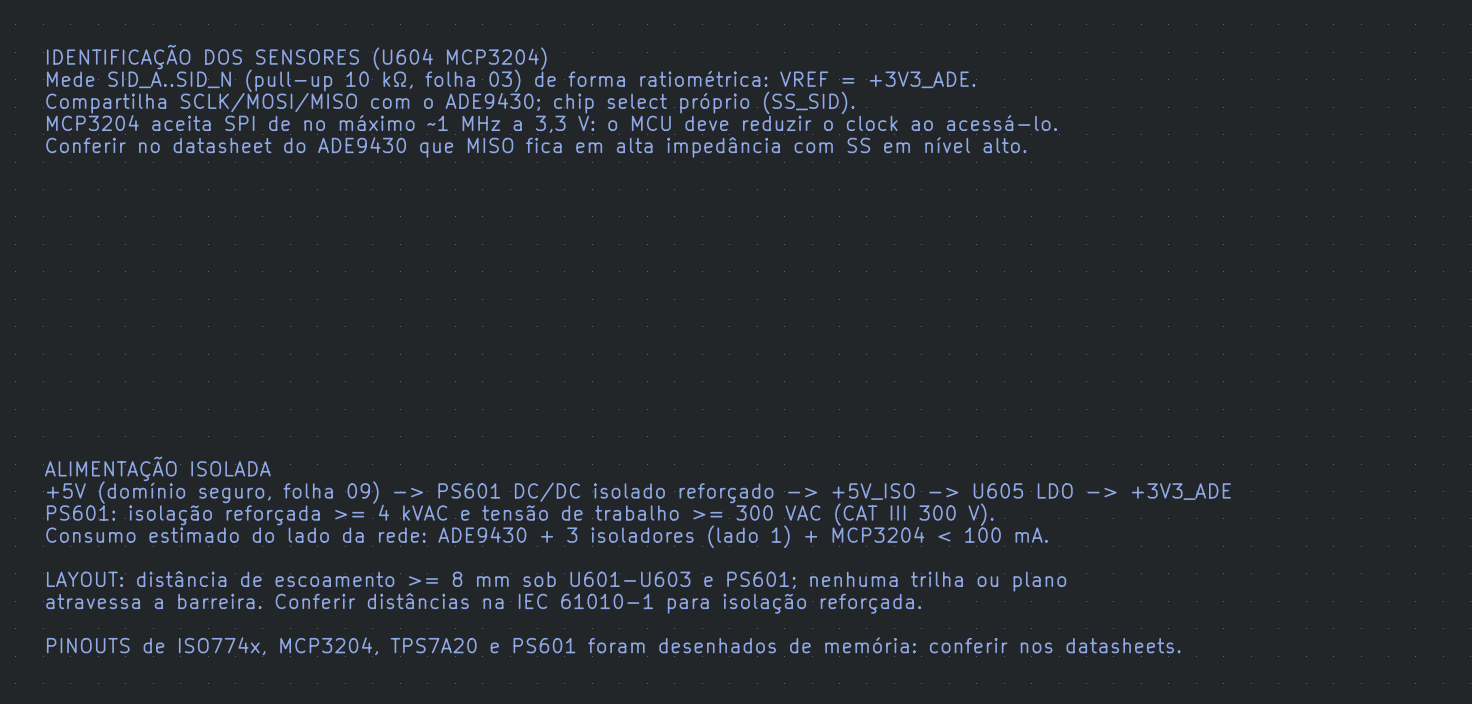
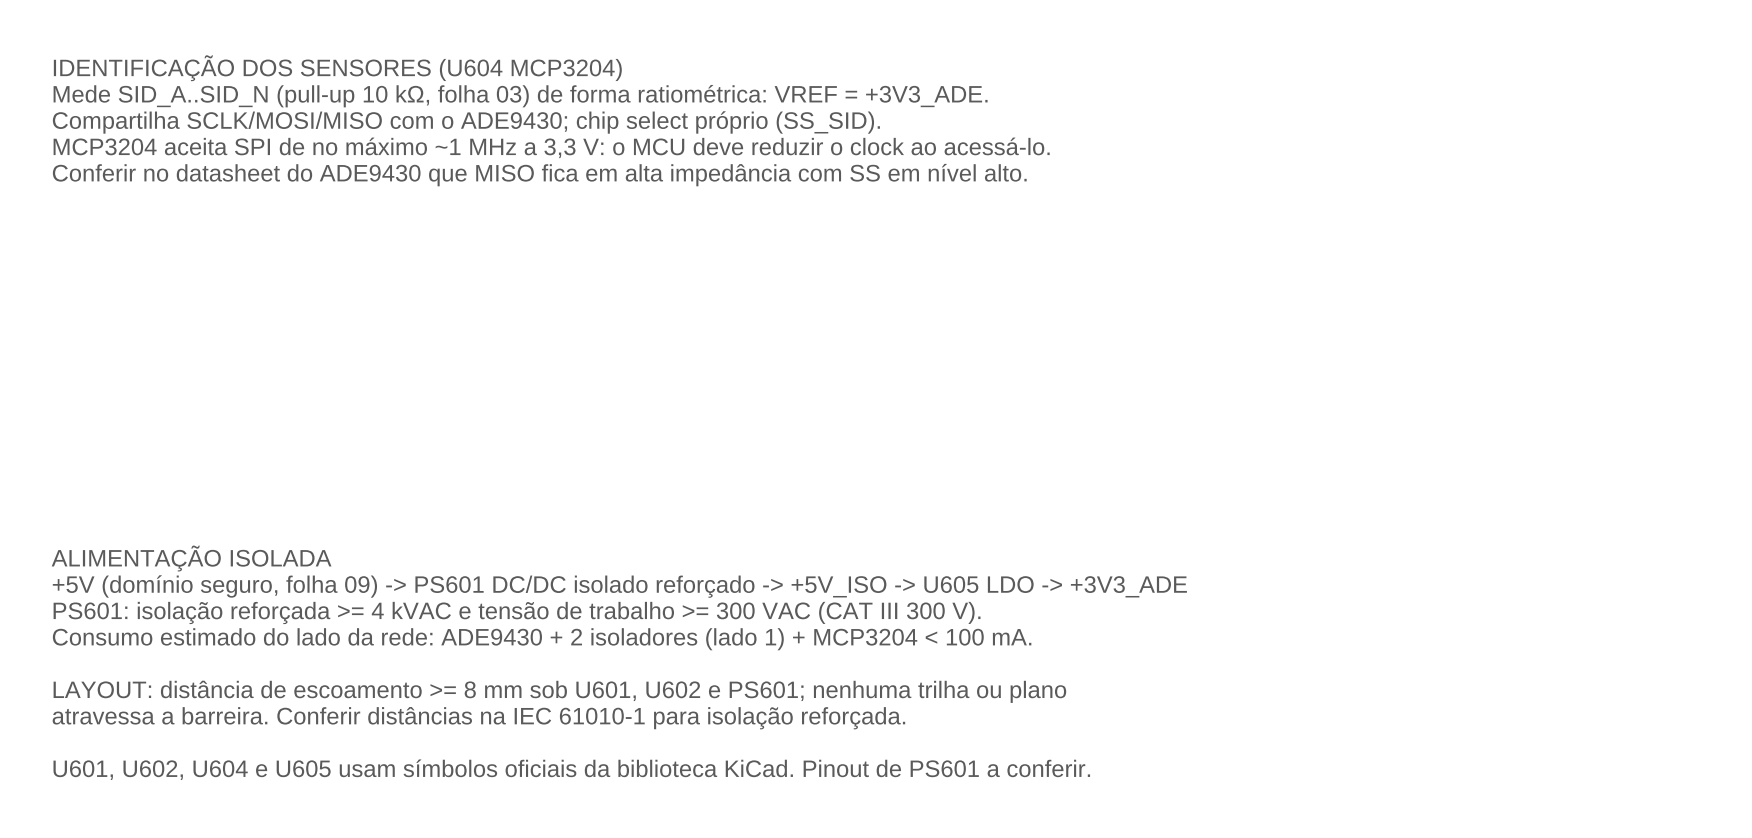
text: Consumo estimado do lado da rede: ADE9430 + 3 isoladores (lado 1) + MCP3204 < 100 mA. (547, 536) -> Consumo estimado do lado da rede: ADE9430 + 2 isoladores (lado 1) + MCP3204 < 100 mA. (542, 639)
text: LAYOUT: distância de escoamento >= 8 mm sob U601-U603 e PS601; nenhuma trilha ou plano (556, 581) -> LAYOUT: distância de escoamento >= 8 mm sob U601, U602 e PS601; nenhuma trilha ou plano (559, 691)
text: PINOUTS de ISO774x, MCP3204, TPS7A20 e PS601 foram desenhados de memória: conferir nos datasheets. (613, 646) -> U601, U602, U604 e U605 usam símbolos oficiais da biblioteca KiCad. Pinout de PS601 a conferir. (571, 769)

